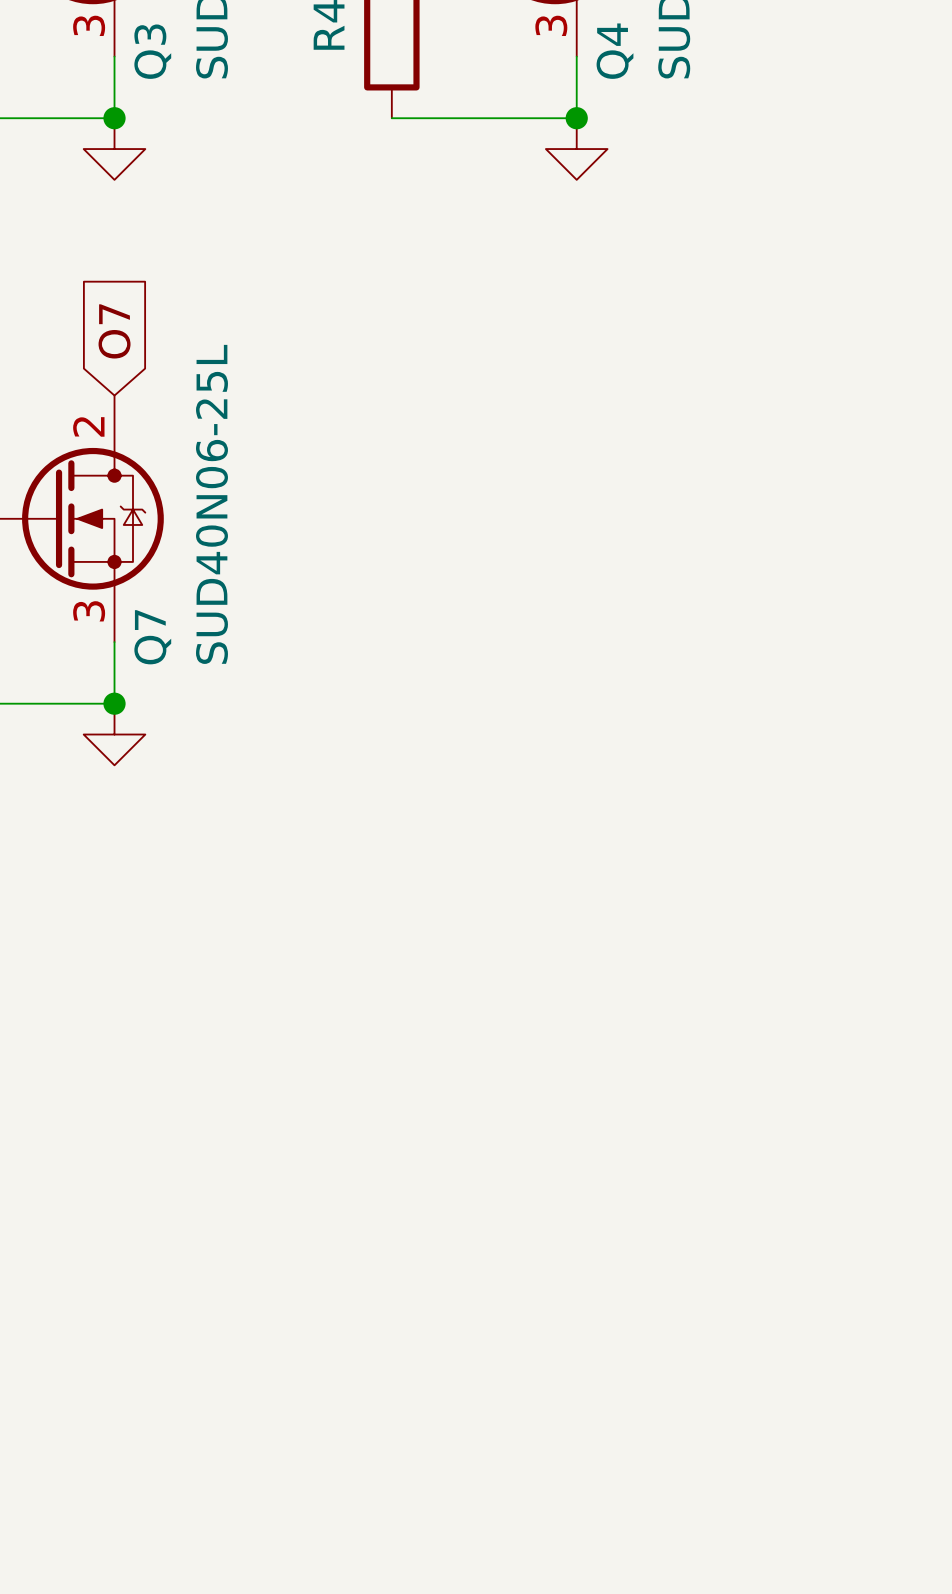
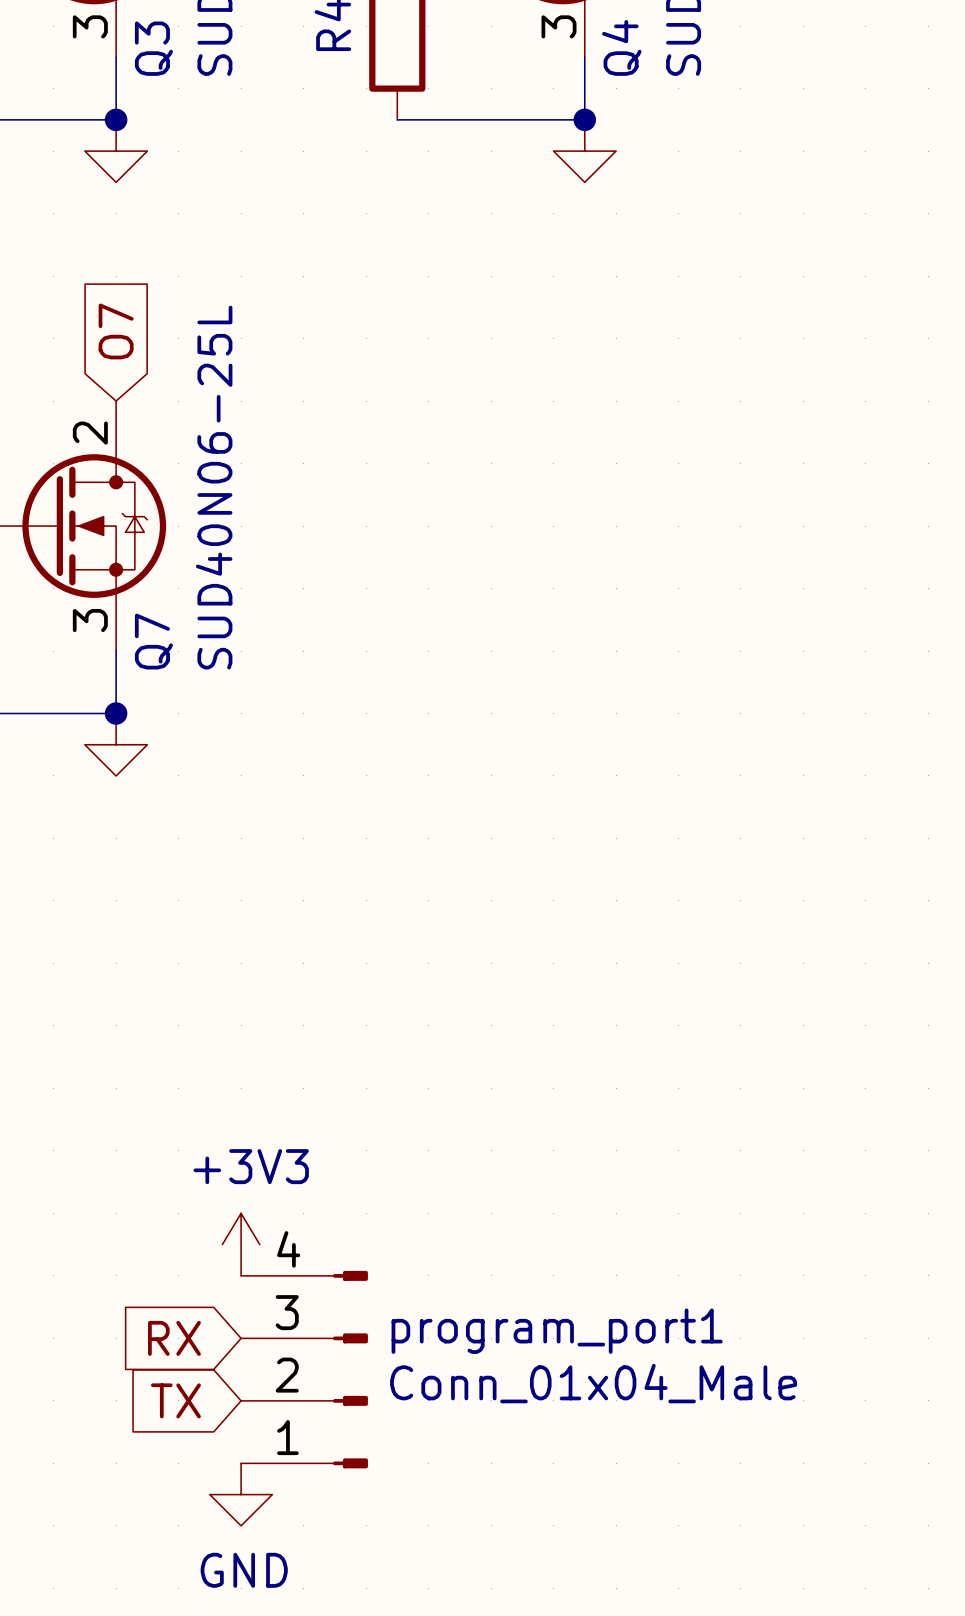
power symbol: none -> +3V3 (241, 1244)
global label: none -> RX (174, 1338)
program_port1: none -> Conn_01x04_Male (304, 1369)
global label: none -> TX (175, 1400)
power symbol: none -> GND (241, 1494)

